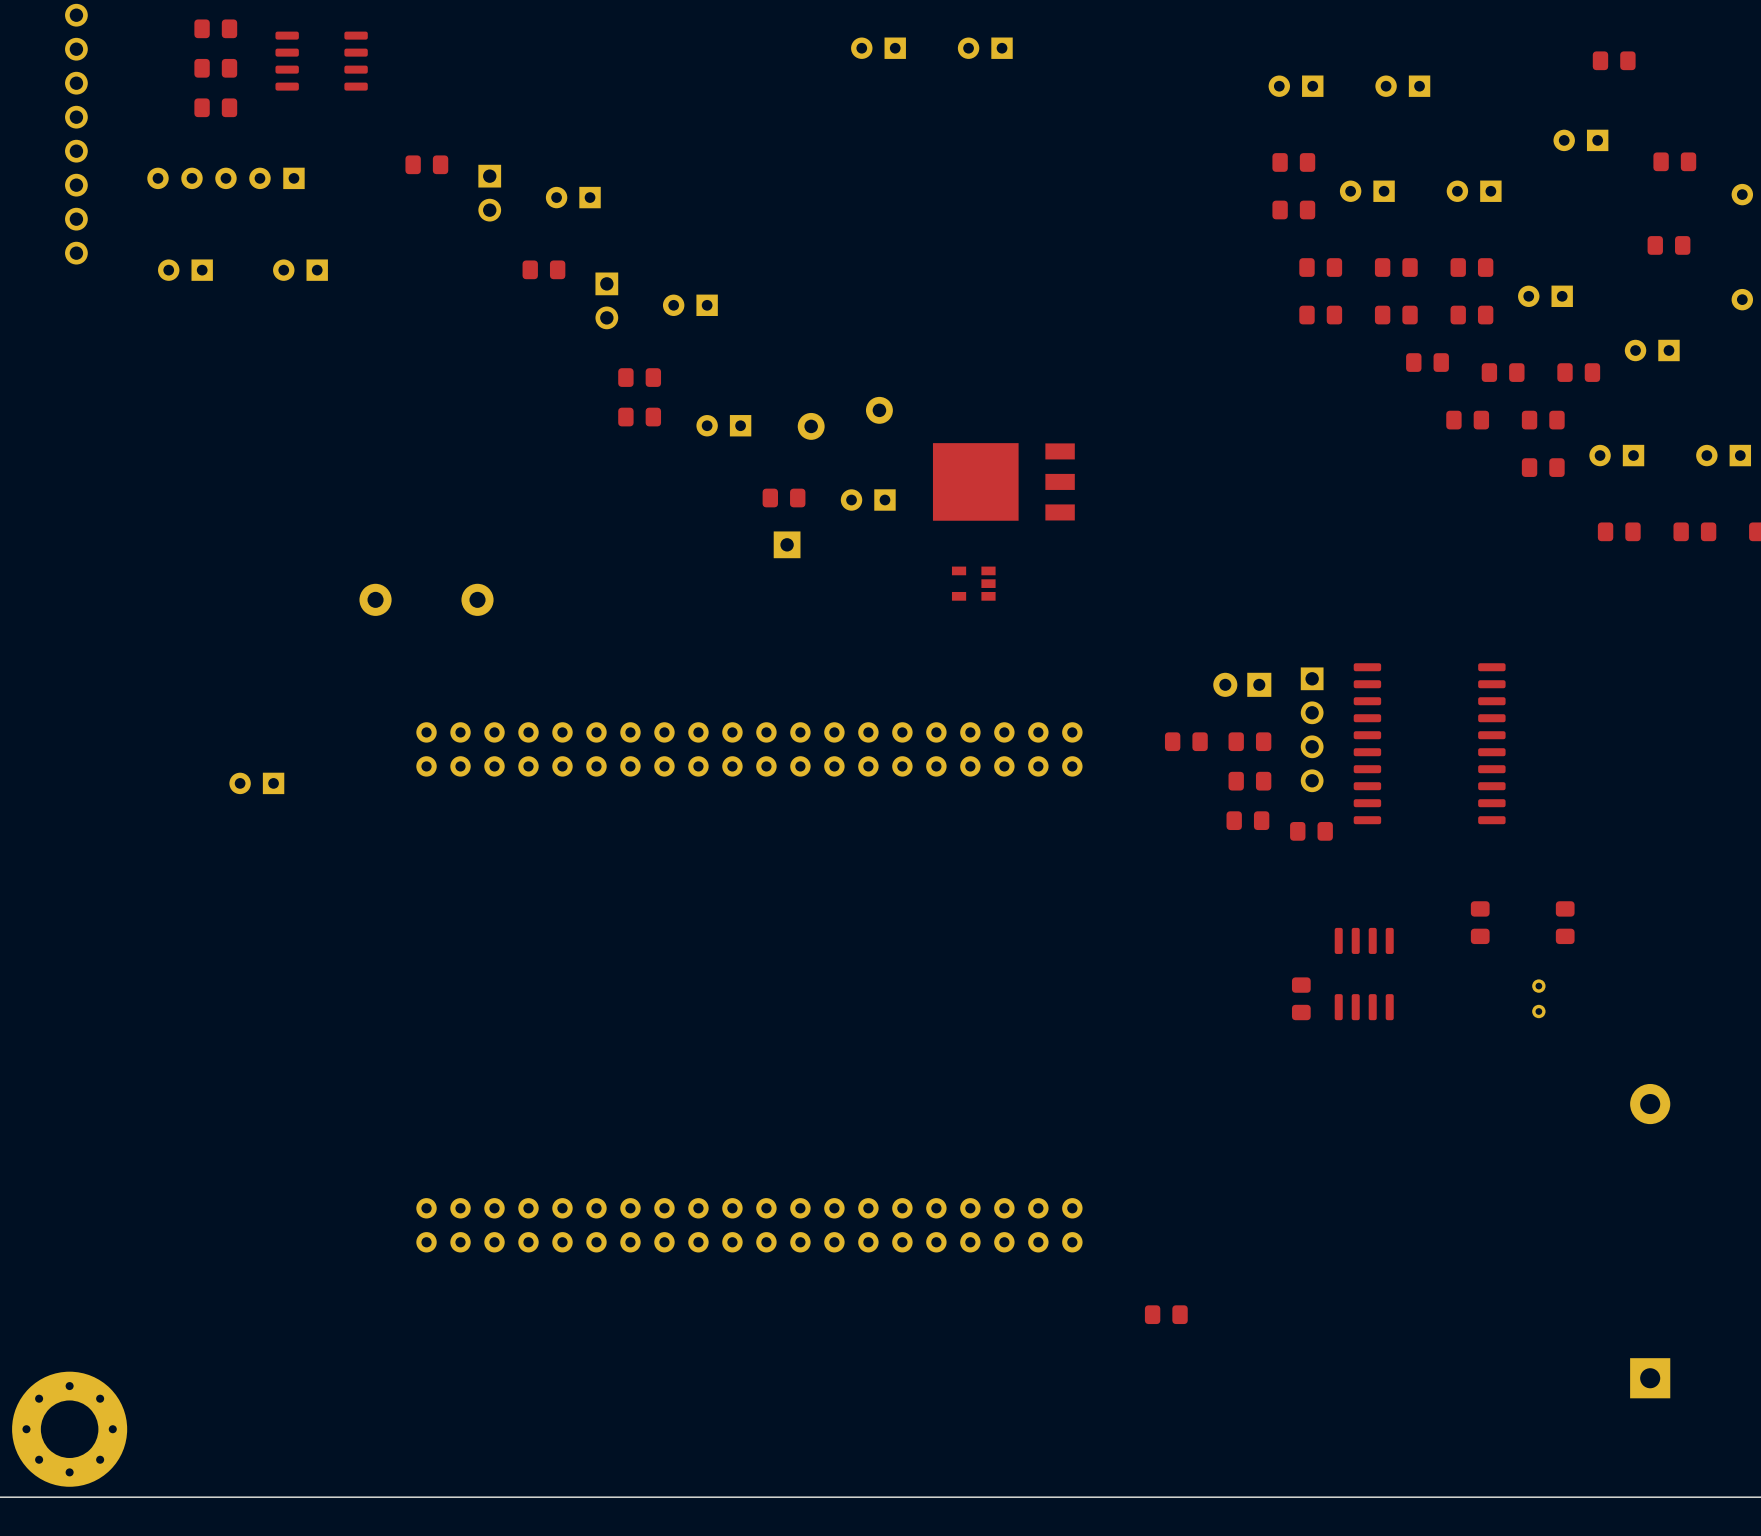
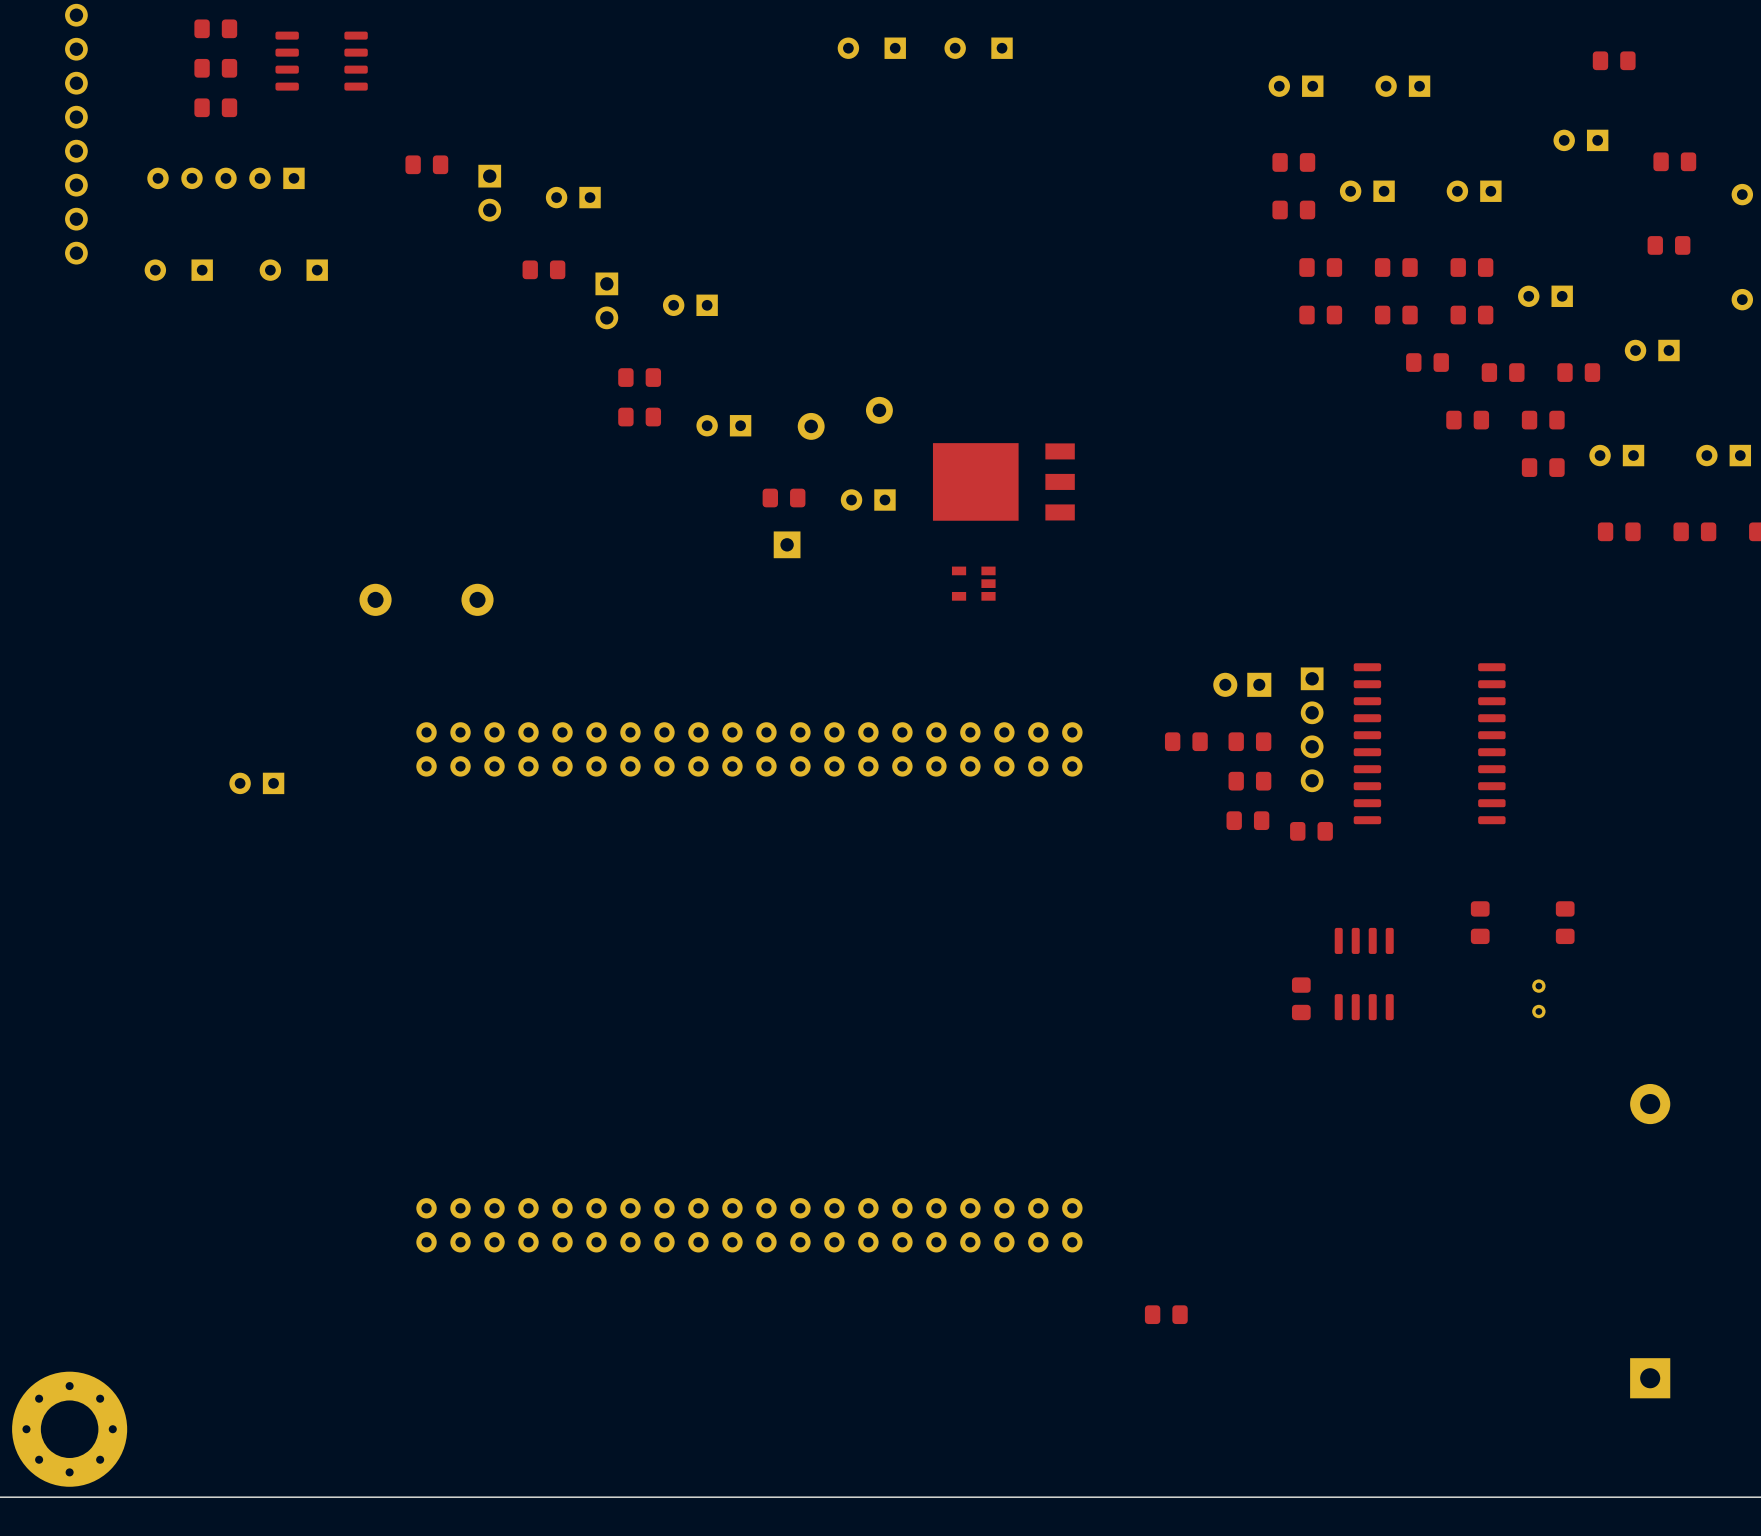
part footprint: [851, 37, 906, 59] -> [837, 37, 906, 59]
part footprint: [957, 37, 1013, 59] -> [944, 37, 1013, 59]
part footprint: [158, 259, 213, 281] -> [144, 259, 213, 281]
part footprint: [273, 259, 328, 281] -> [259, 259, 328, 281]

